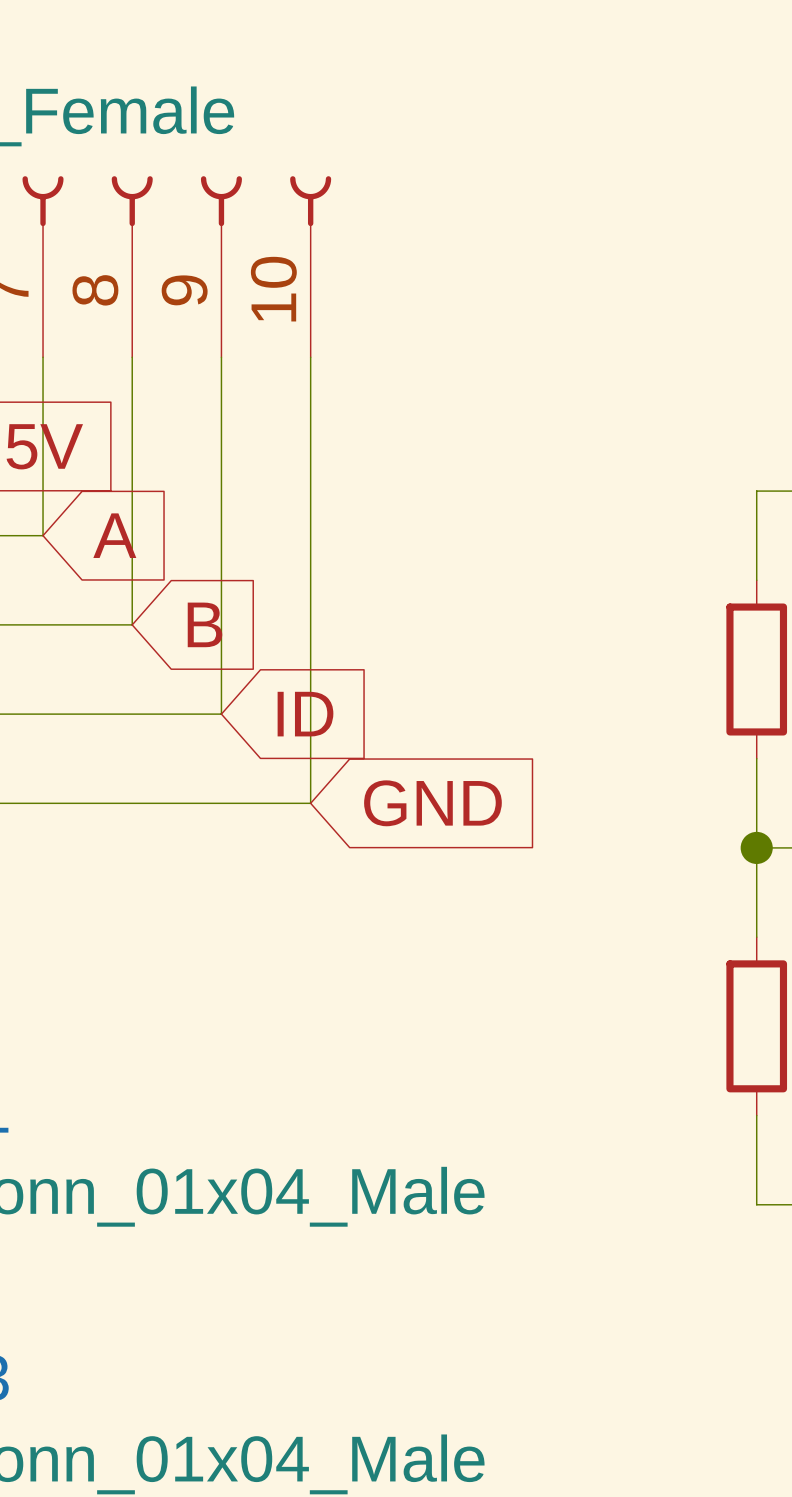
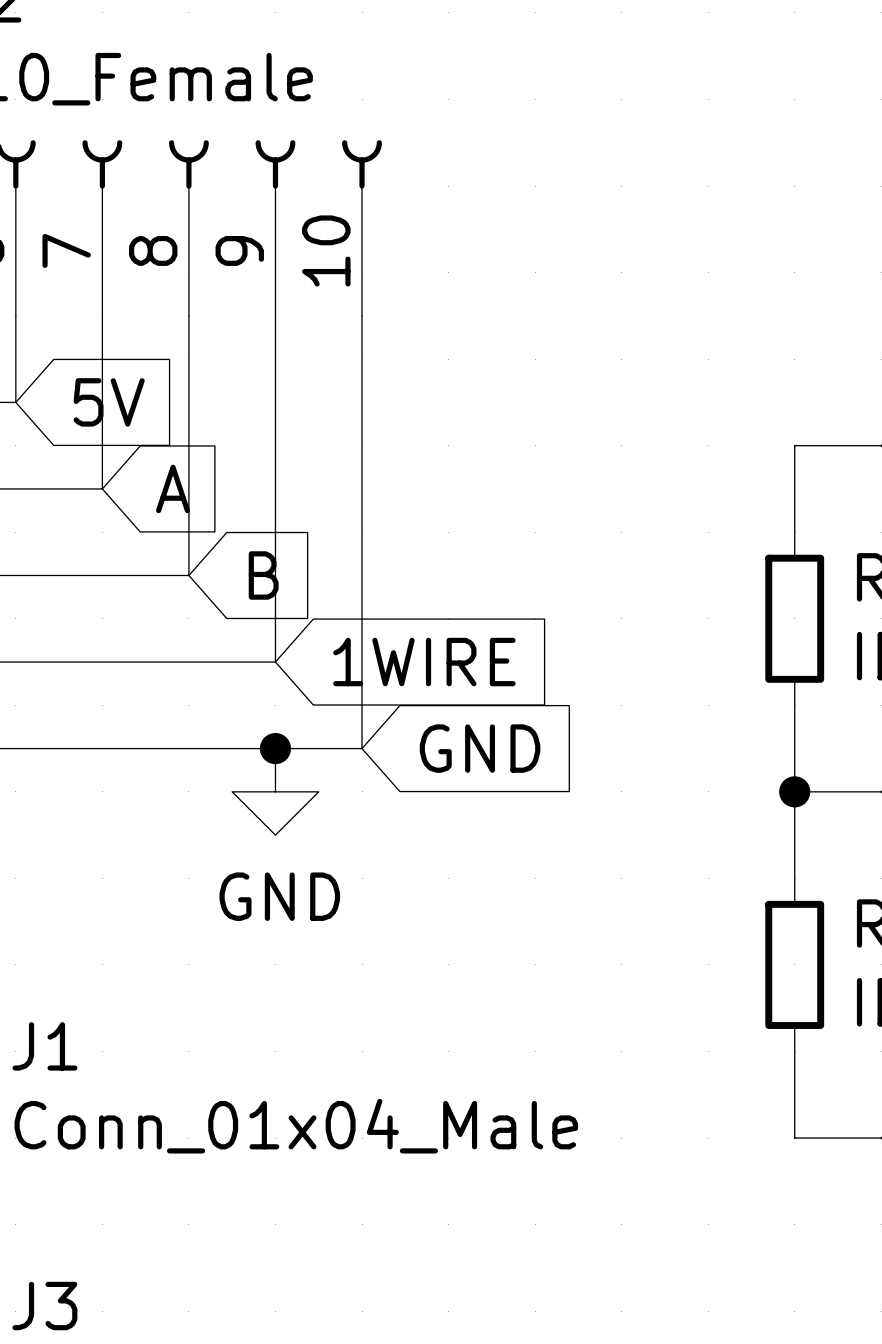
global label: ID (305, 714) -> 1WIRE (424, 662)
junction: none -> (275, 748)
power symbol: none -> GND (275, 791)

